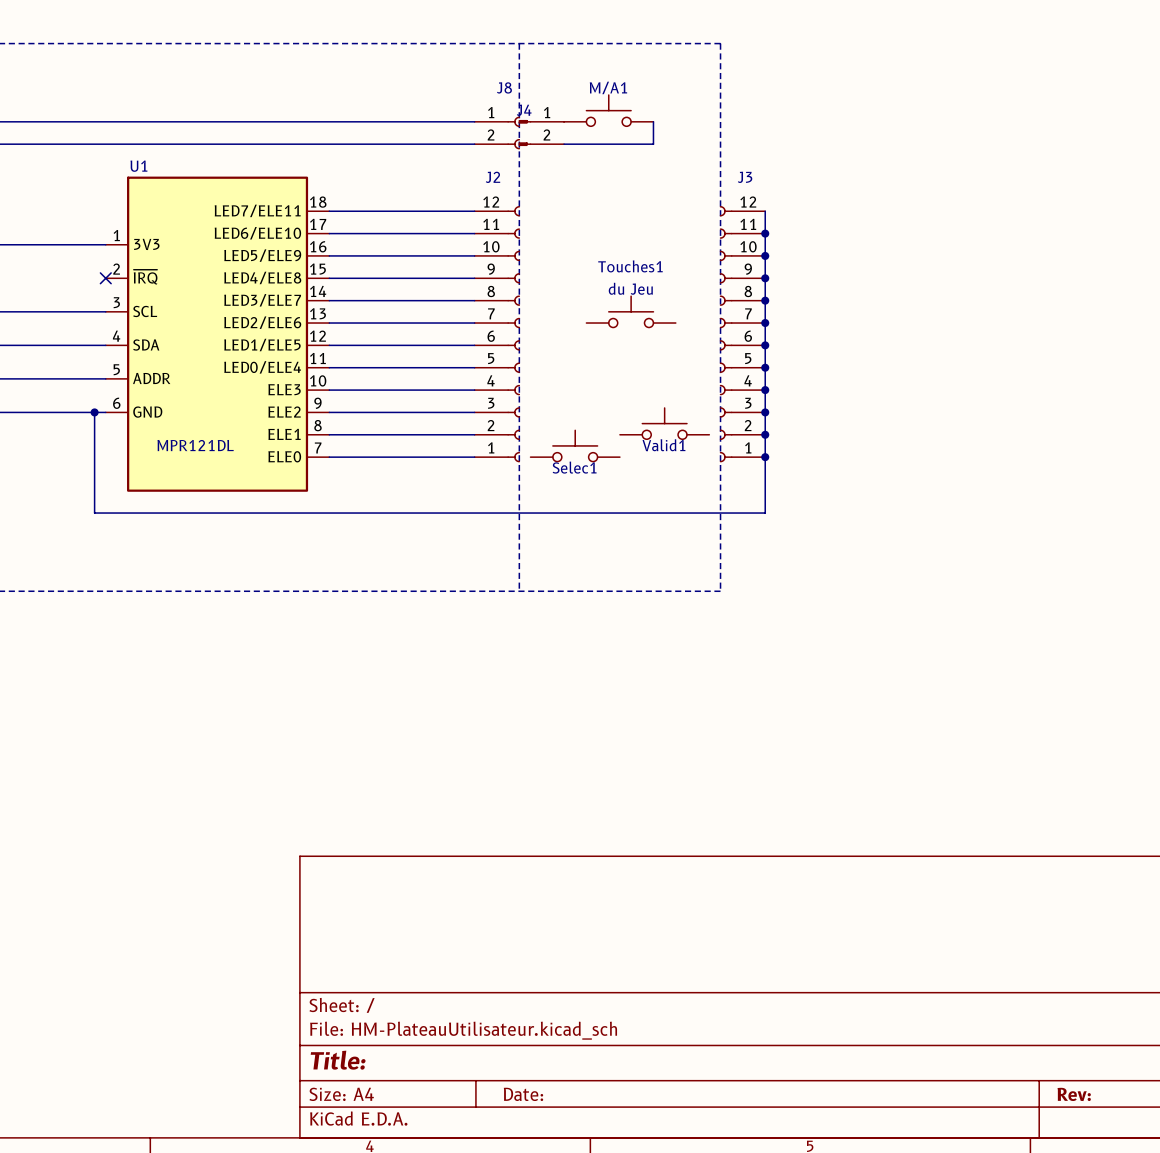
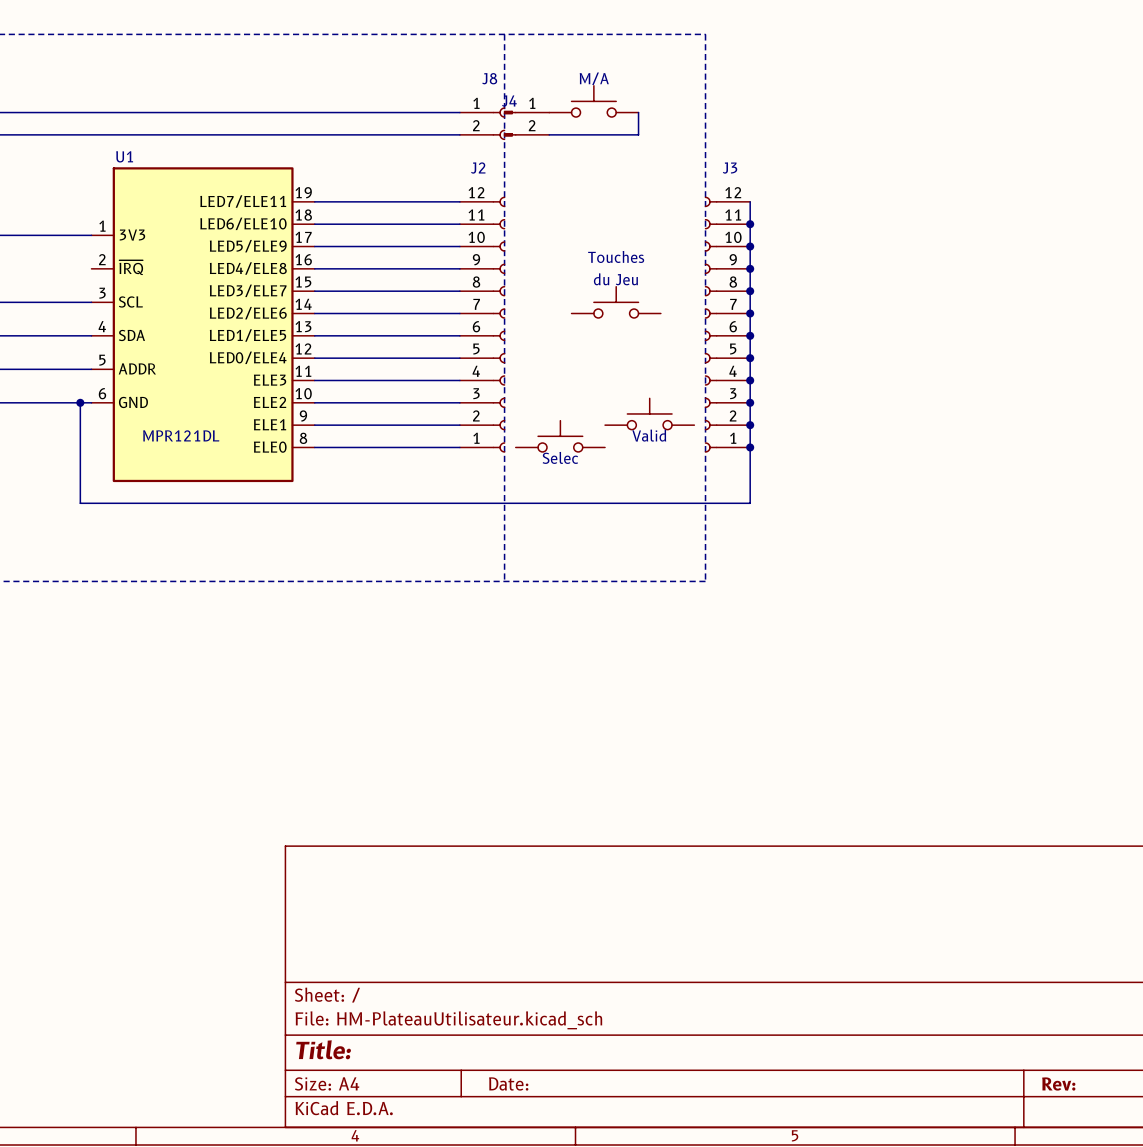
M/A1 name: M/A1 (608, 87) -> M/A (594, 78)
U1 symbol: [105, 176, 330, 492] -> [91, 167, 315, 483]
Touches1 name: Touches1 (630, 266) -> Touches (616, 256)
no-connect mark: (105, 278) -> none
Valid1 name: Valid1 (663, 445) -> Valid (649, 435)
Selec1 name: Selec1 (574, 467) -> Selec (560, 457)

